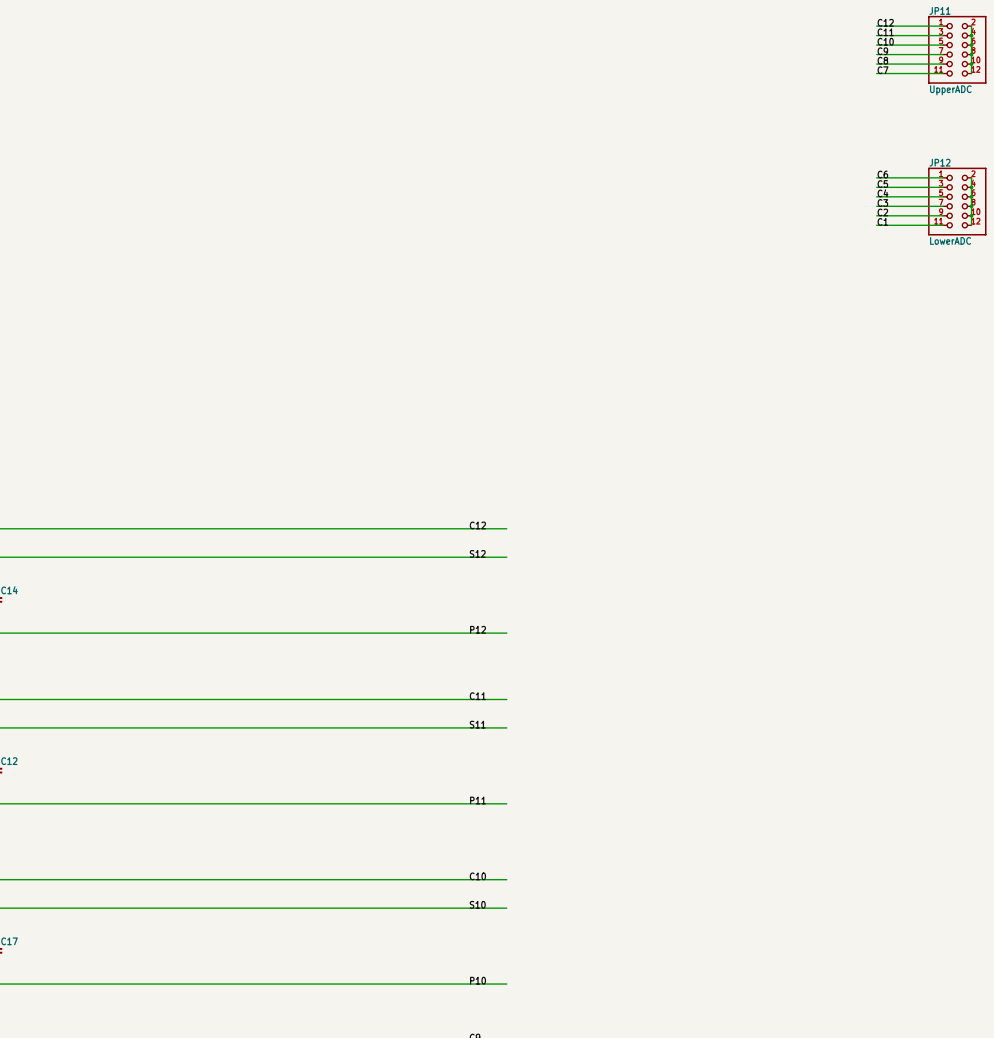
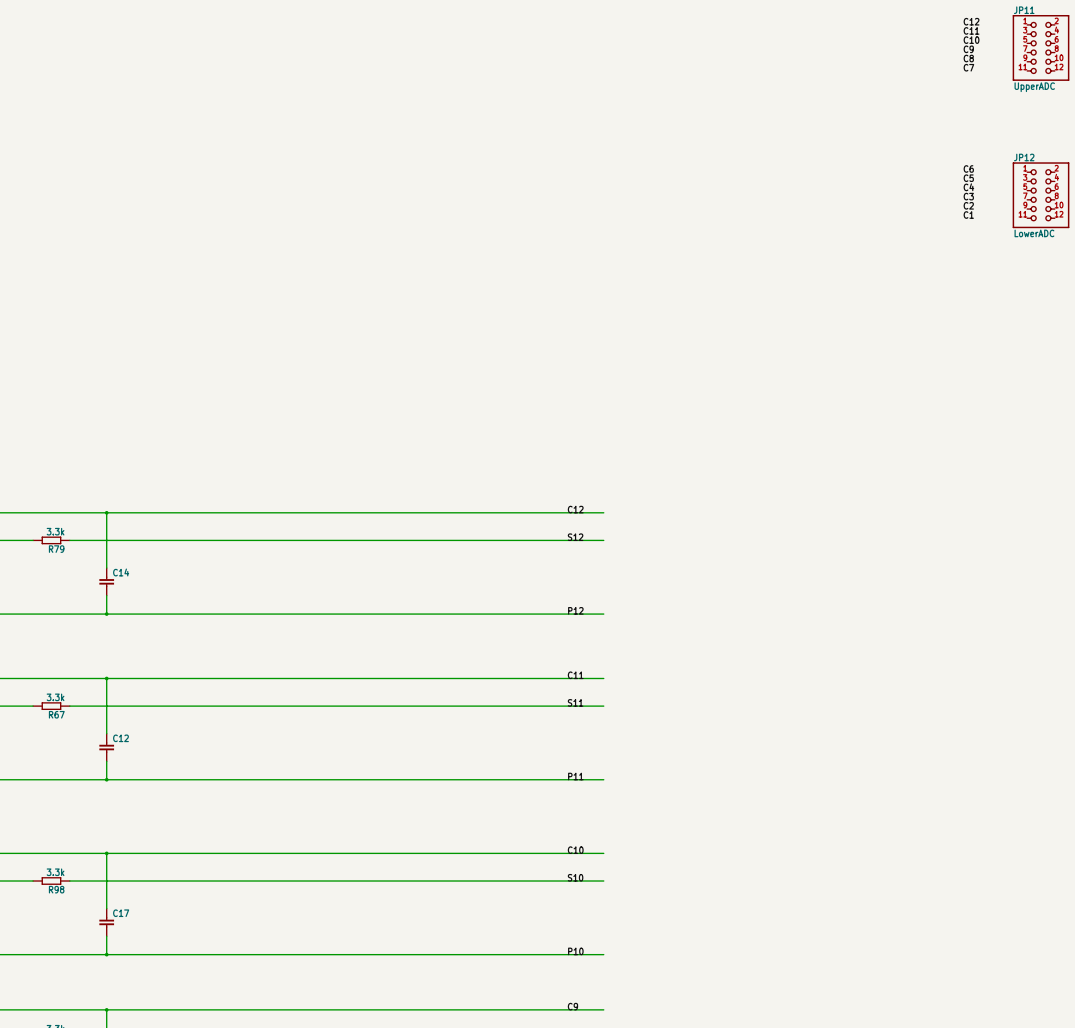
wire: (876, 26) (943, 26) -> none
wire: (971, 26) (971, 73) -> none
wire: (876, 35) (943, 35) -> none
junction: (971, 35) -> none
wire: (876, 45) (943, 45) -> none
junction: (971, 45) -> none
wire: (876, 54) (943, 54) -> none
junction: (971, 54) -> none
wire: (876, 64) (943, 64) -> none
junction: (971, 64) -> none
wire: (876, 73) (943, 73) -> none
wire: (876, 177) (943, 177) -> none
wire: (971, 177) (971, 225) -> none
wire: (876, 187) (943, 187) -> none
junction: (971, 187) -> none
wire: (876, 196) (943, 196) -> none
junction: (971, 196) -> none
wire: (876, 206) (943, 206) -> none
junction: (971, 206) -> none
wire: (876, 215) (943, 215) -> none
junction: (971, 215) -> none
wire: (876, 225) (943, 225) -> none

